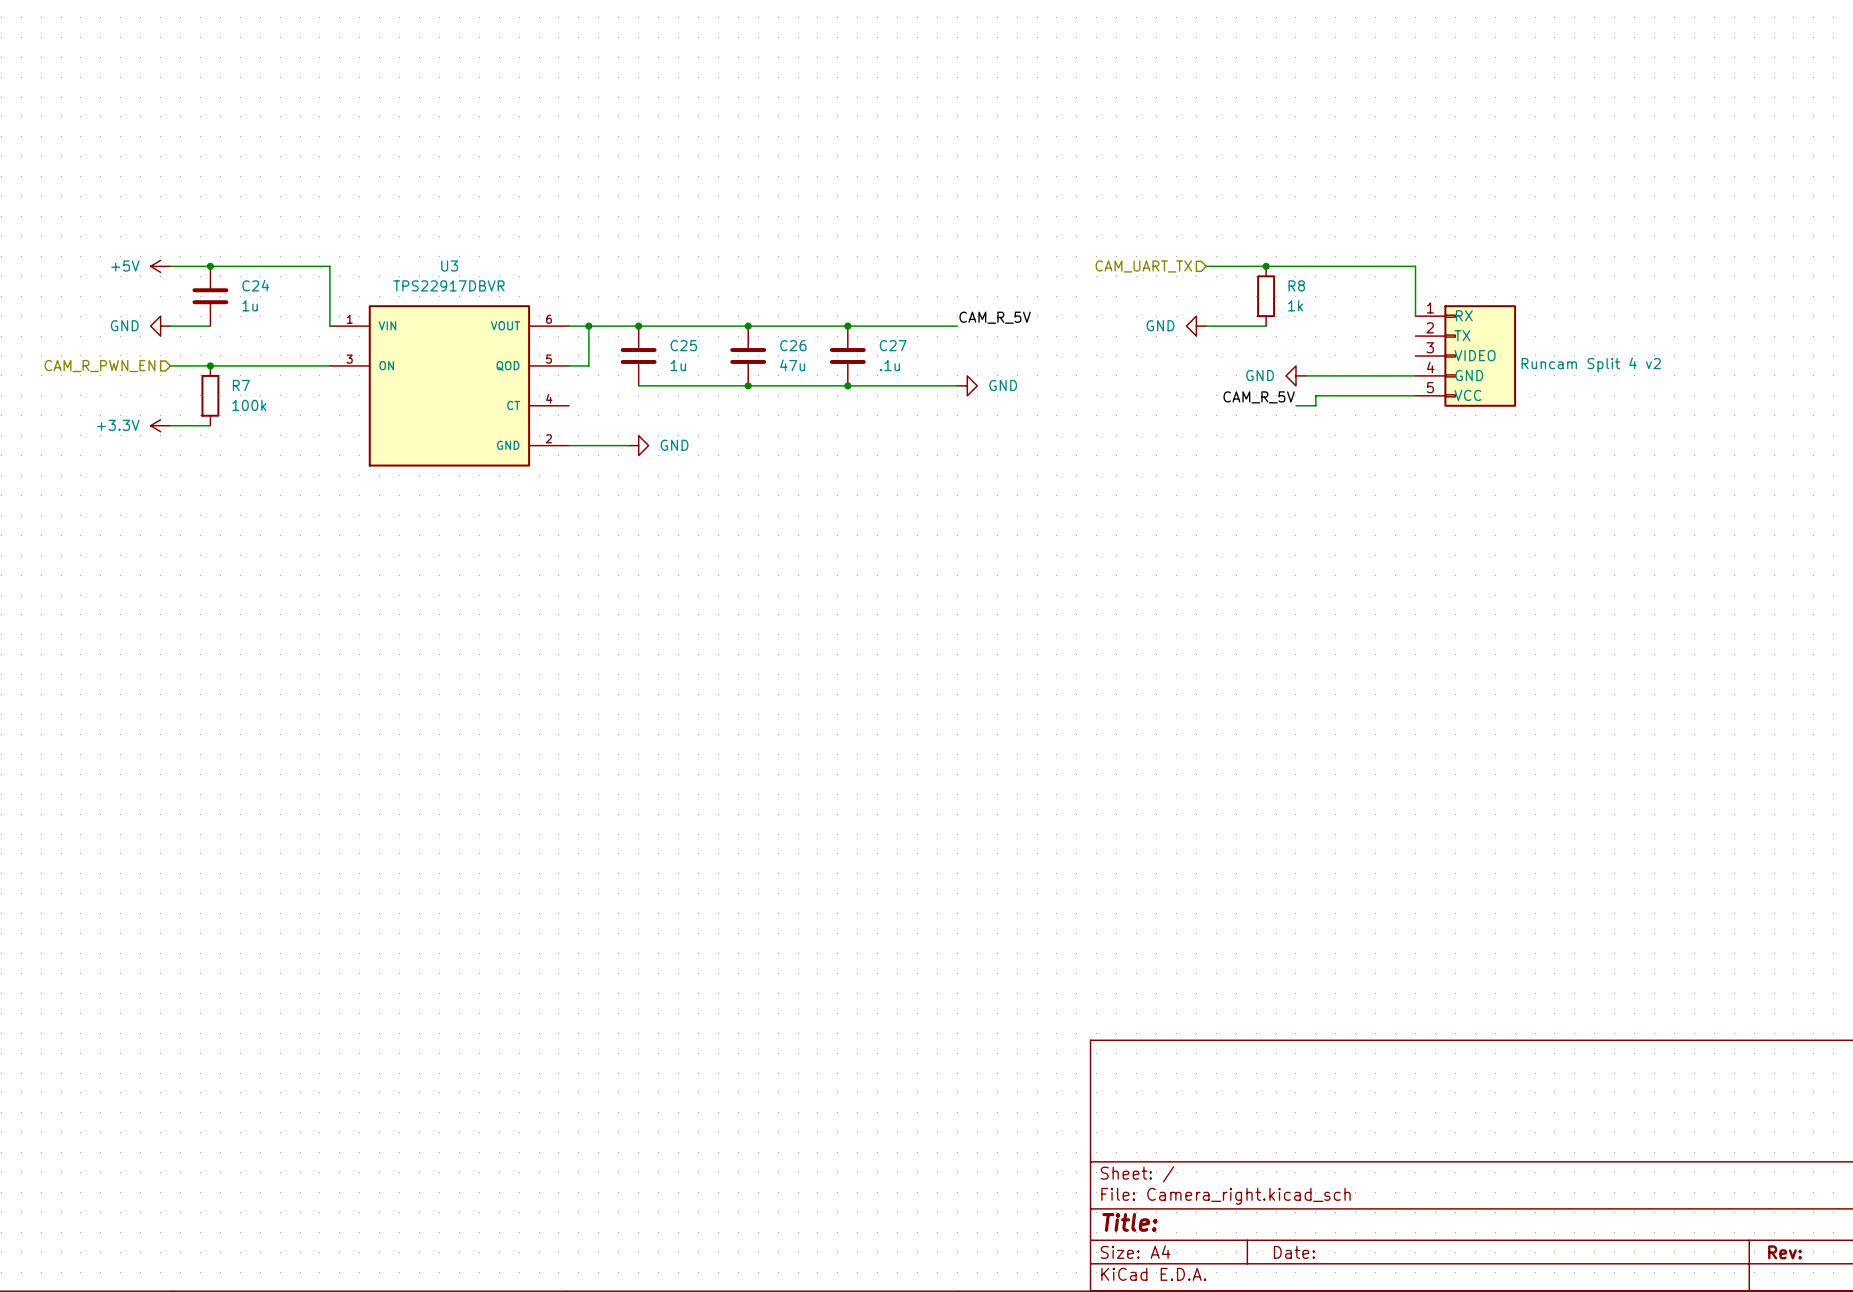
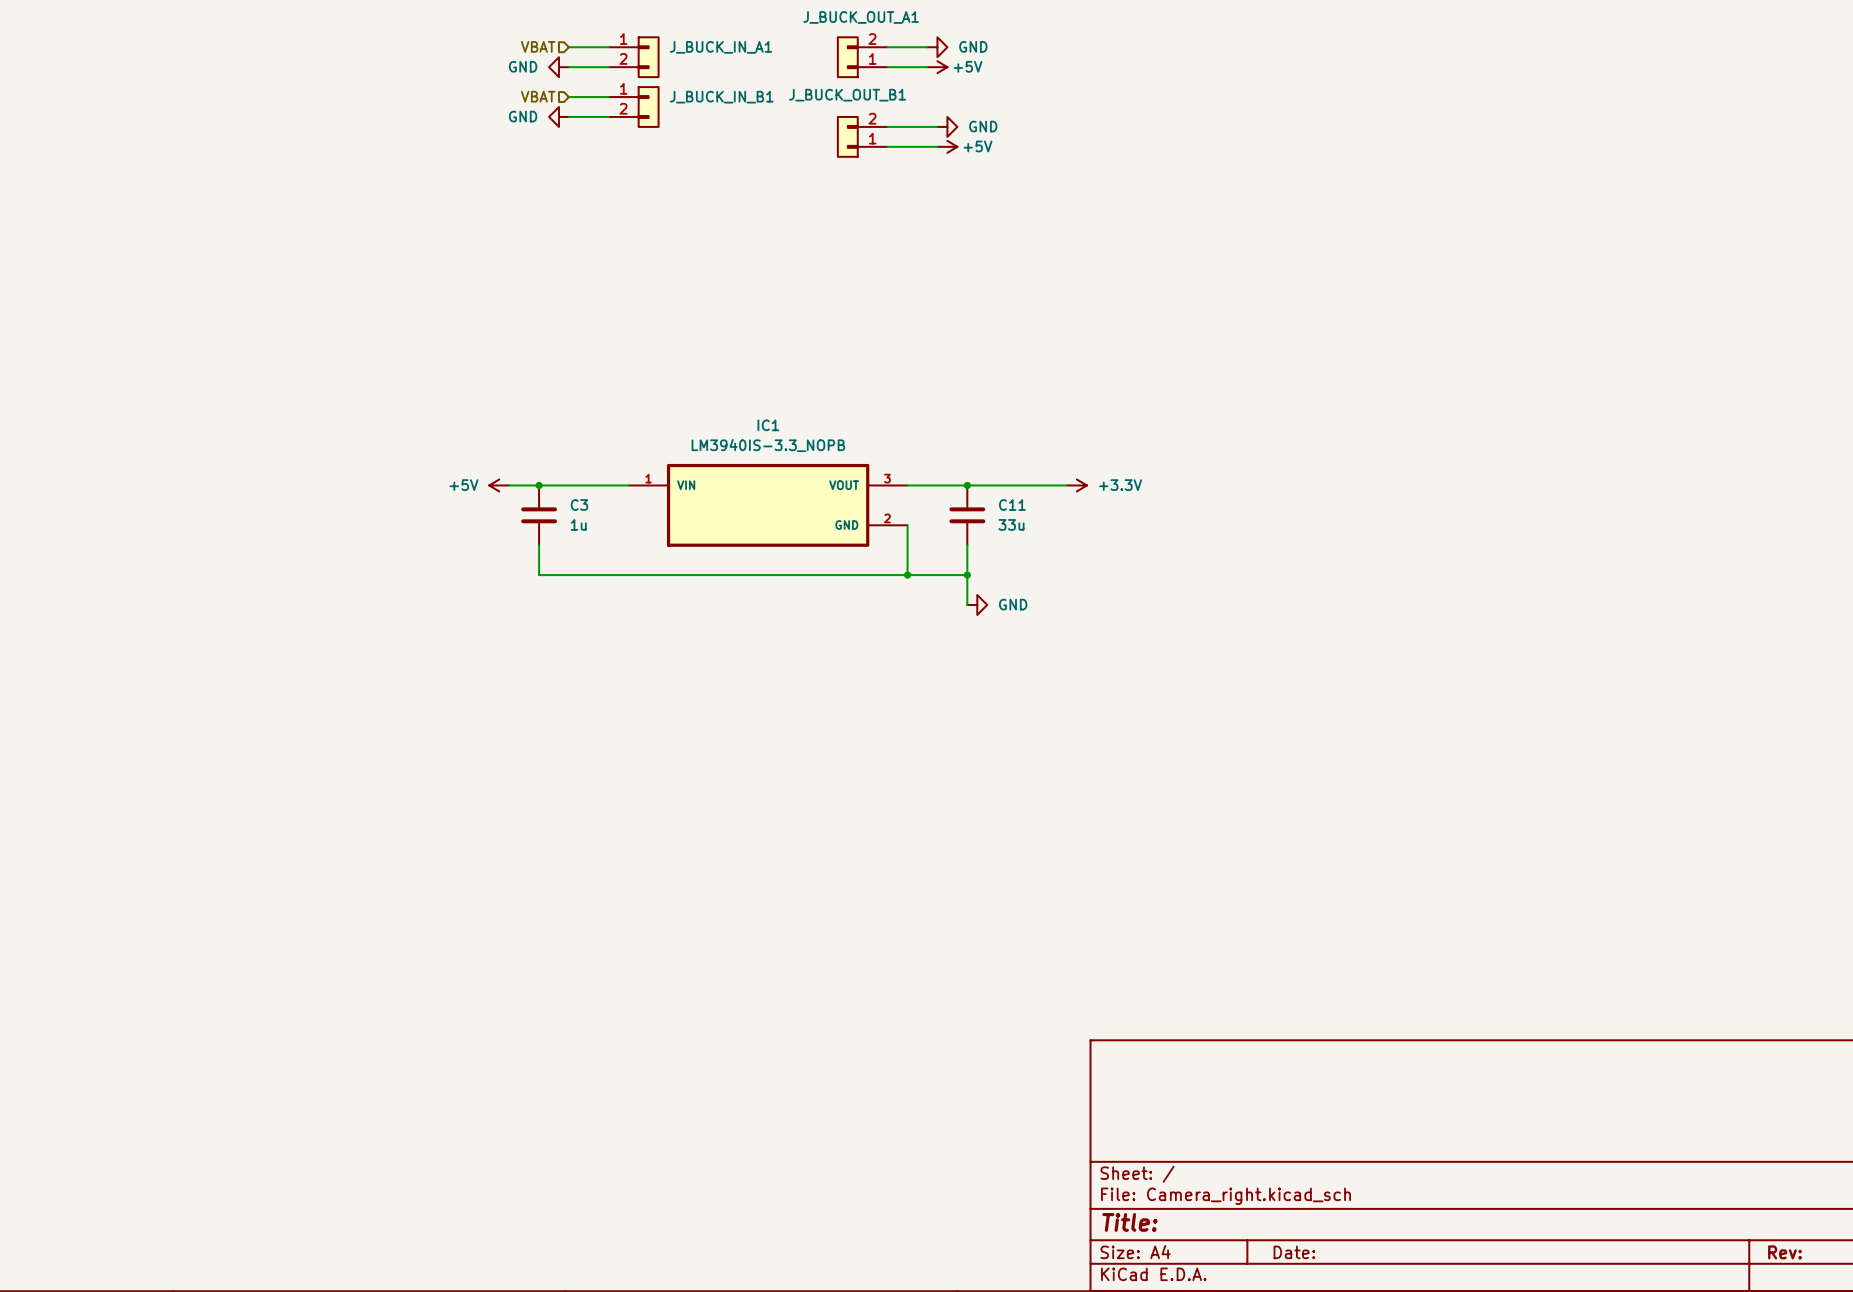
hierarchical label: none -> VBAT (538, 46)
wire: none -> (568, 47) (608, 47)
wire: none -> (887, 47) (927, 47)
power symbol: none -> GND (937, 47)
J_BUCK_IN_A1: none -> (634, 57)
J_BUCK_OUT_A1: none -> (862, 57)
power symbol: none -> GND (558, 67)
wire: none -> (568, 67) (608, 67)
wire: none -> (887, 67) (927, 67)
power symbol: none -> +5V (937, 67)
hierarchical label: none -> VBAT (538, 96)
wire: none -> (568, 97) (608, 97)
J_BUCK_IN_B1: none -> (634, 107)
power symbol: none -> GND (558, 116)
wire: none -> (568, 116) (608, 116)
wire: none -> (887, 126) (937, 126)
power symbol: none -> GND (947, 126)
J_BUCK_OUT_B1: none -> (862, 136)
wire: none -> (887, 146) (937, 146)
power symbol: none -> +5V (947, 146)
power symbol: +5V (160, 266) -> none
wire: (170, 266) (329, 266) (329, 326) -> none
junction: (210, 266) -> none
hierarchical label: CAM_UART_TX (1143, 266) -> none
wire: (1206, 266) (1415, 266) (1415, 316) -> none
junction: (1266, 266) -> none
C24: 1u (210, 296) -> none
R8: 1k (1266, 296) -> none
label: CAM_R_5V (995, 317) -> none
power symbol: GND (160, 326) -> none
wire: (170, 326) (210, 326) -> none
wire: (568, 326) (957, 326) -> none
wire: (588, 326) (588, 365) (568, 365) -> none
junction: (588, 326) -> none
junction: (638, 326) -> none
junction: (748, 326) -> none
junction: (847, 326) -> none
power symbol: GND (1196, 326) -> none
wire: (1206, 326) (1266, 326) -> none
C25: 1u (638, 355) -> none
C26: 47u (748, 355) -> none
C27: .1u (847, 355) -> none
part: Runcam Split 4 v2 (1465, 355) -> none
wire: (170, 365) (329, 365) -> none
junction: (210, 365) -> none
hierarchical label: CAM_R_PWN_EN (99, 366) -> none
power symbol: GND (1295, 375) -> none
wire: (1305, 375) (1415, 375) -> none
U3: TPS22917DBVR (449, 385) -> none
wire: (638, 385) (957, 385) -> none
junction: (748, 385) -> none
junction: (847, 385) -> none
power symbol: GND (967, 385) -> none
R7: 100k (210, 395) -> none
wire: (1415, 395) (1315, 395) (1315, 405) (1295, 405) -> none
label: CAM_R_5V (1259, 397) -> none
power symbol: +3.3V (160, 425) -> none
wire: (170, 425) (210, 425) -> none
wire: (568, 445) (628, 445) -> none
power symbol: GND (638, 445) -> none
power symbol: none -> +5V (499, 485)
wire: none -> (509, 485) (628, 485)
junction: none -> (539, 485)
wire: none -> (907, 485) (1066, 485)
junction: none -> (967, 485)
power symbol: none -> +3.3V (1076, 485)
IC1: none -> LM3940IS-3.3_NOPB (768, 505)
C3: none -> 1u (539, 515)
C11: none -> 33u (967, 515)
wire: none -> (907, 525) (907, 575)
wire: none -> (539, 545) (539, 575) (967, 575)
wire: none -> (967, 545) (967, 604)
junction: none -> (907, 575)
junction: none -> (967, 575)
power symbol: none -> GND (977, 604)

